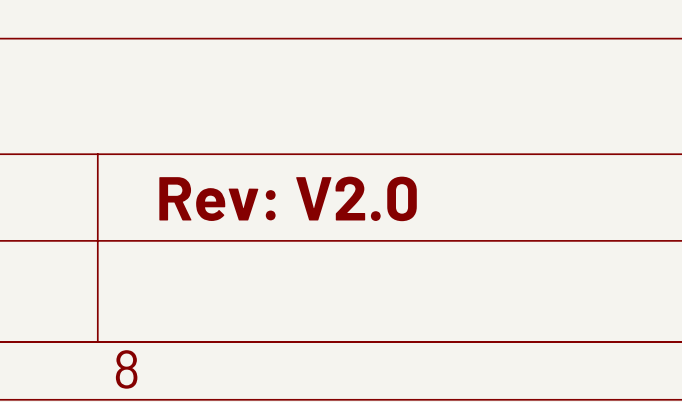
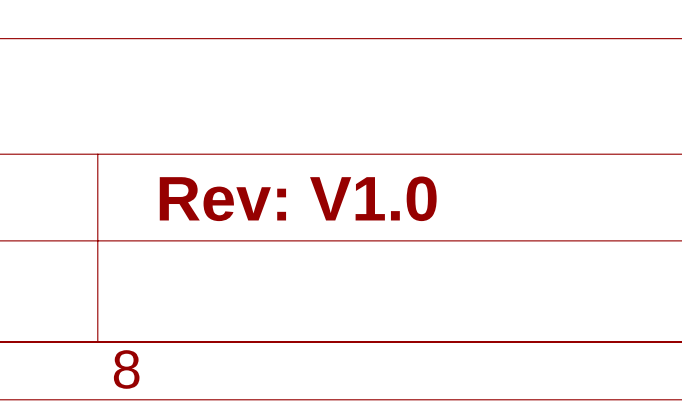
title block: Rev: V2.0 (288, 198) -> Rev: V1.0 (298, 198)

